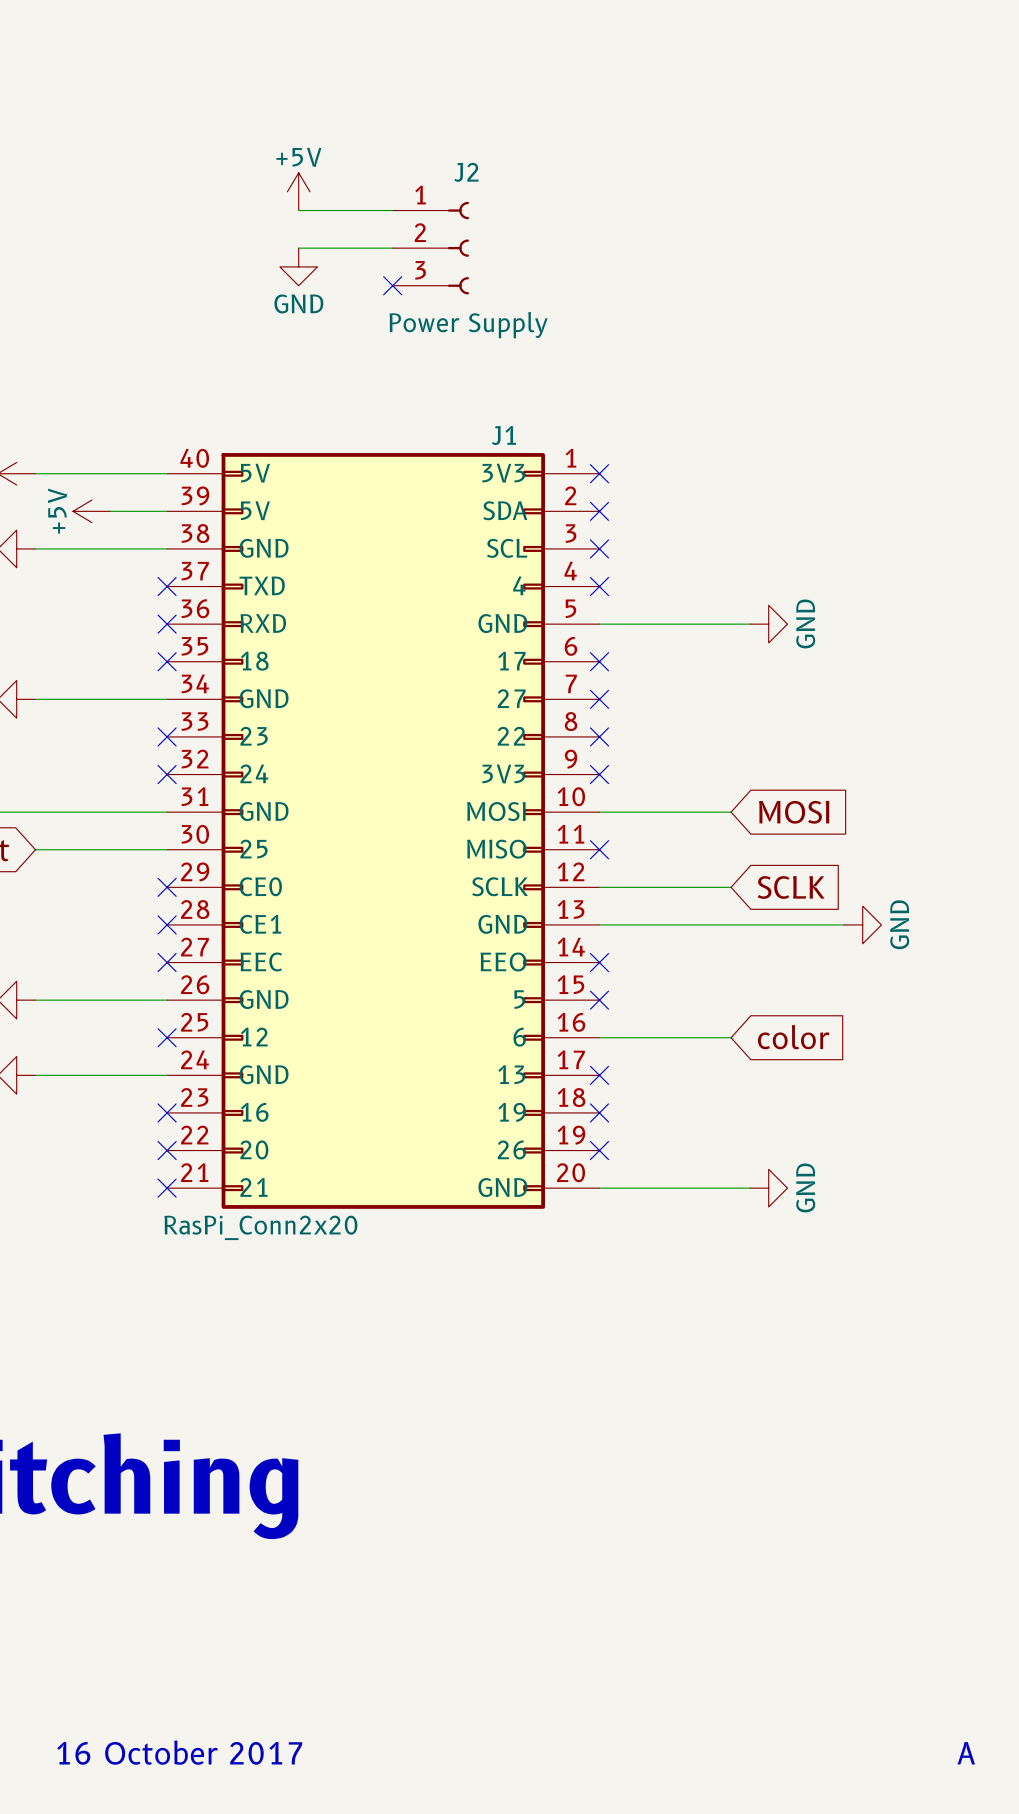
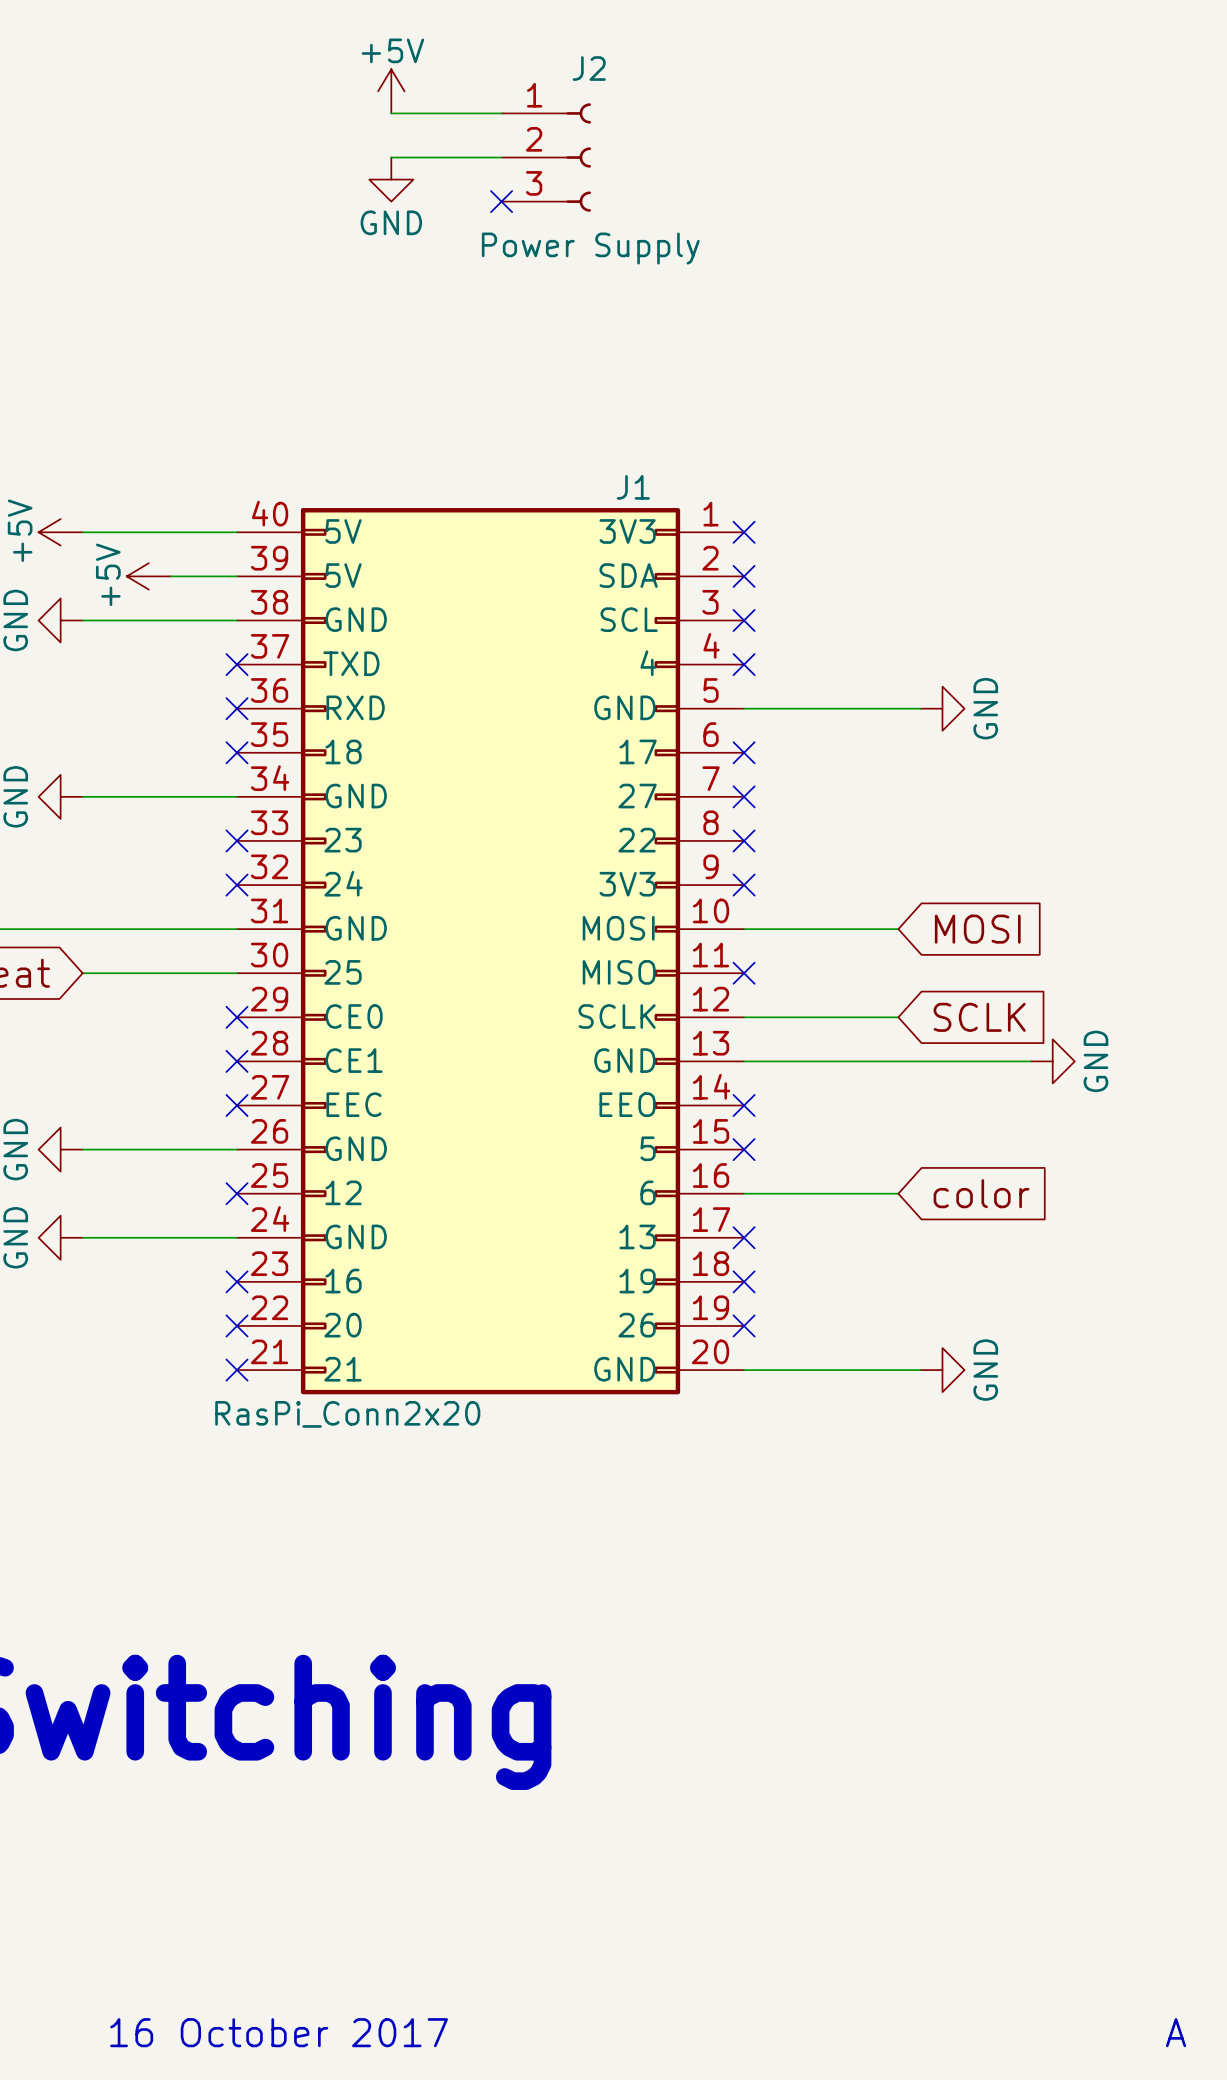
power symbol position: +5V (298, 191) -> +5V (391, 91)
no-connect mark: none -> (501, 201)
wire: (298, 210) (392, 210) -> (391, 157) (501, 157)
wire: (298, 248) (392, 248) -> (391, 113) (501, 113)
J2 position: (430, 248) -> (546, 157)
power symbol position: GND (298, 266) -> GND (391, 179)
no-connect mark: (392, 285) -> none

